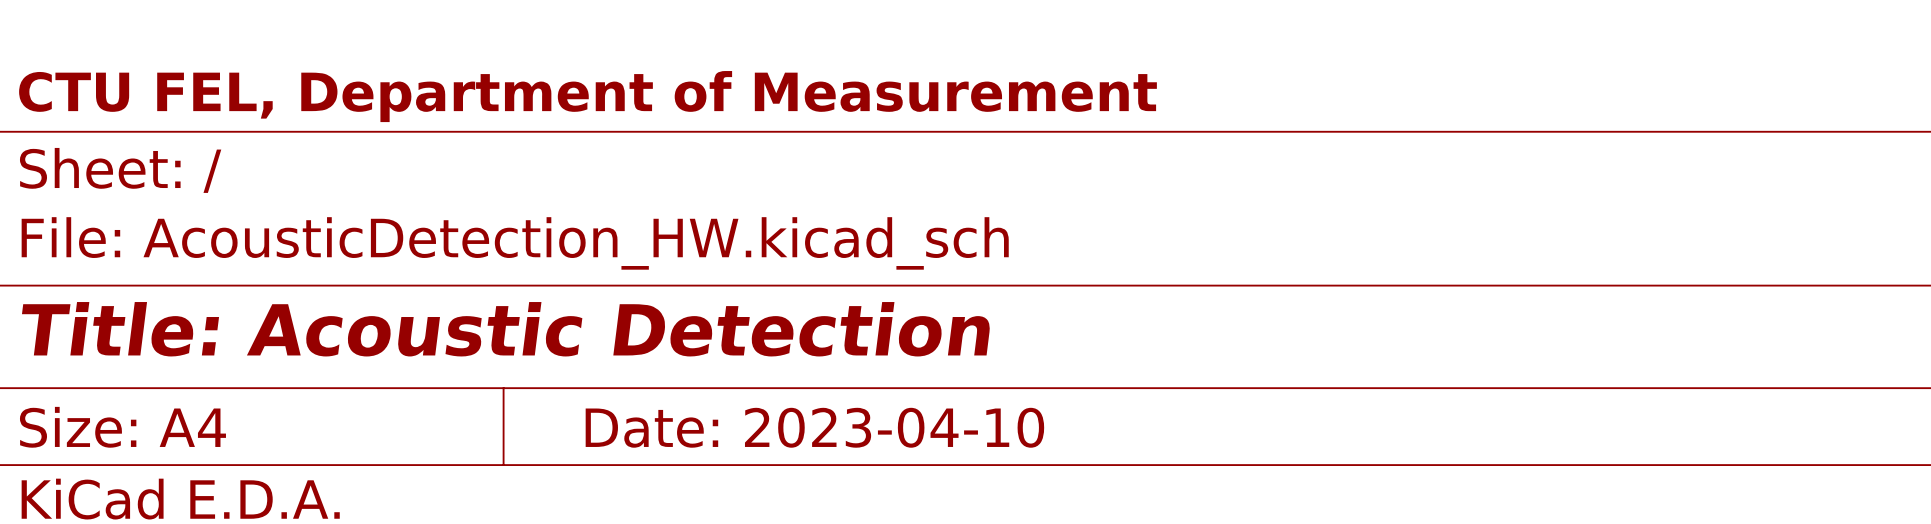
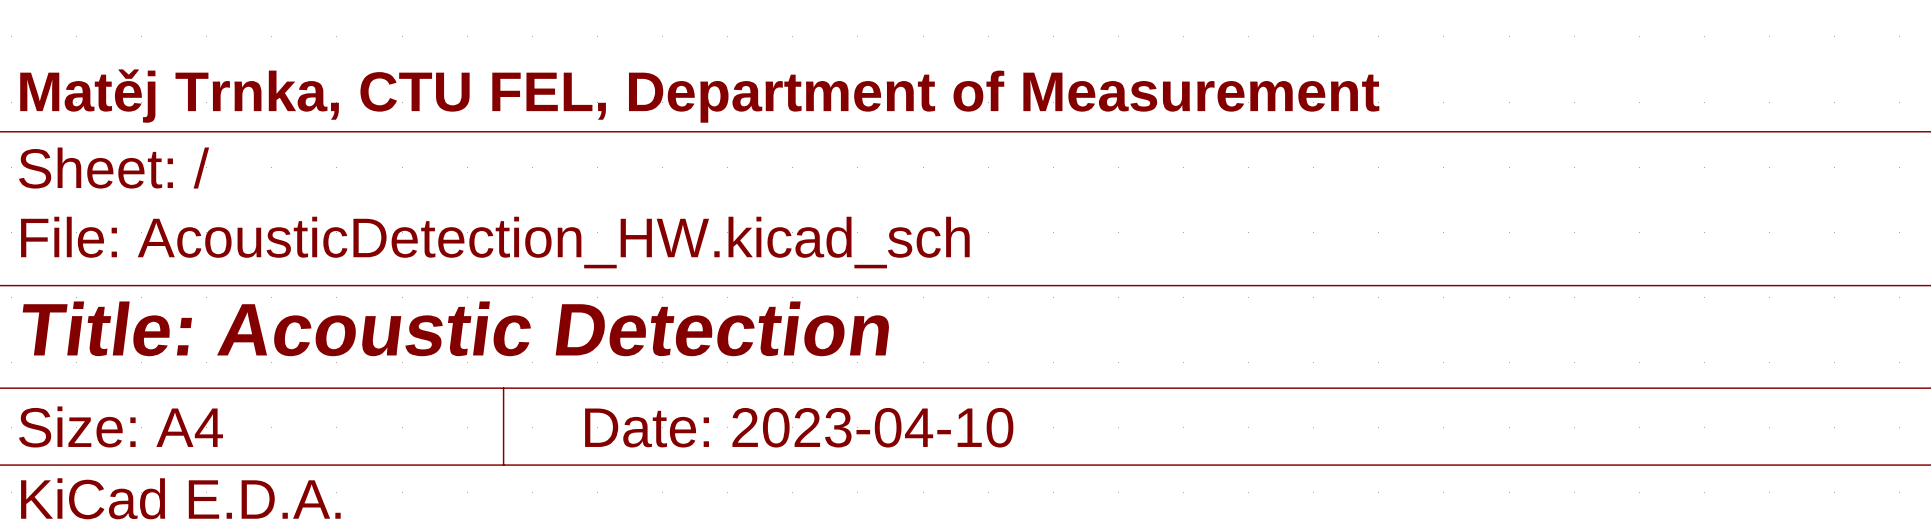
title block: CTU FEL, Department of Measurement (587, 96) -> Matěj Trnka, CTU FEL, Department of Measurement (699, 96)

